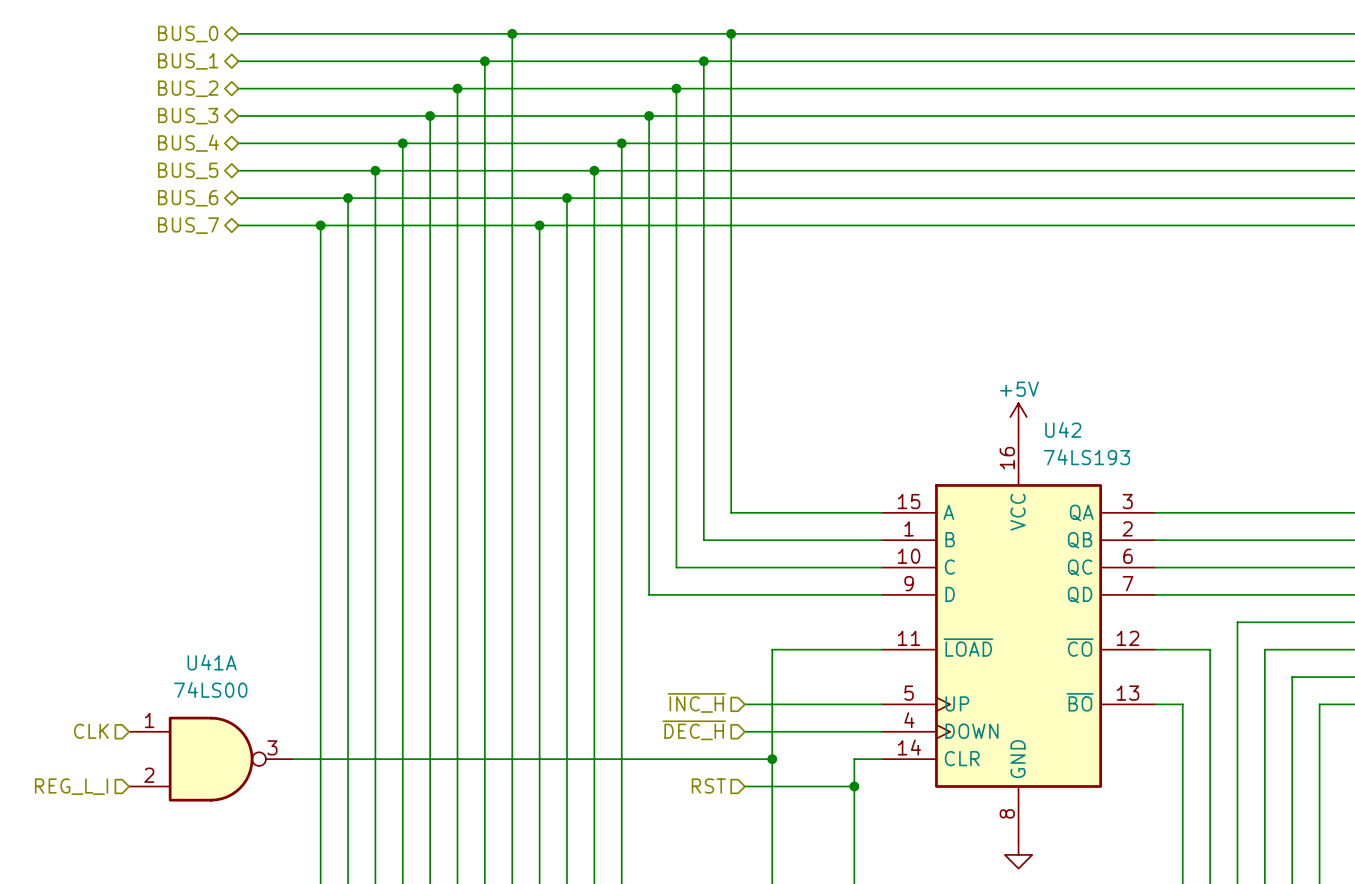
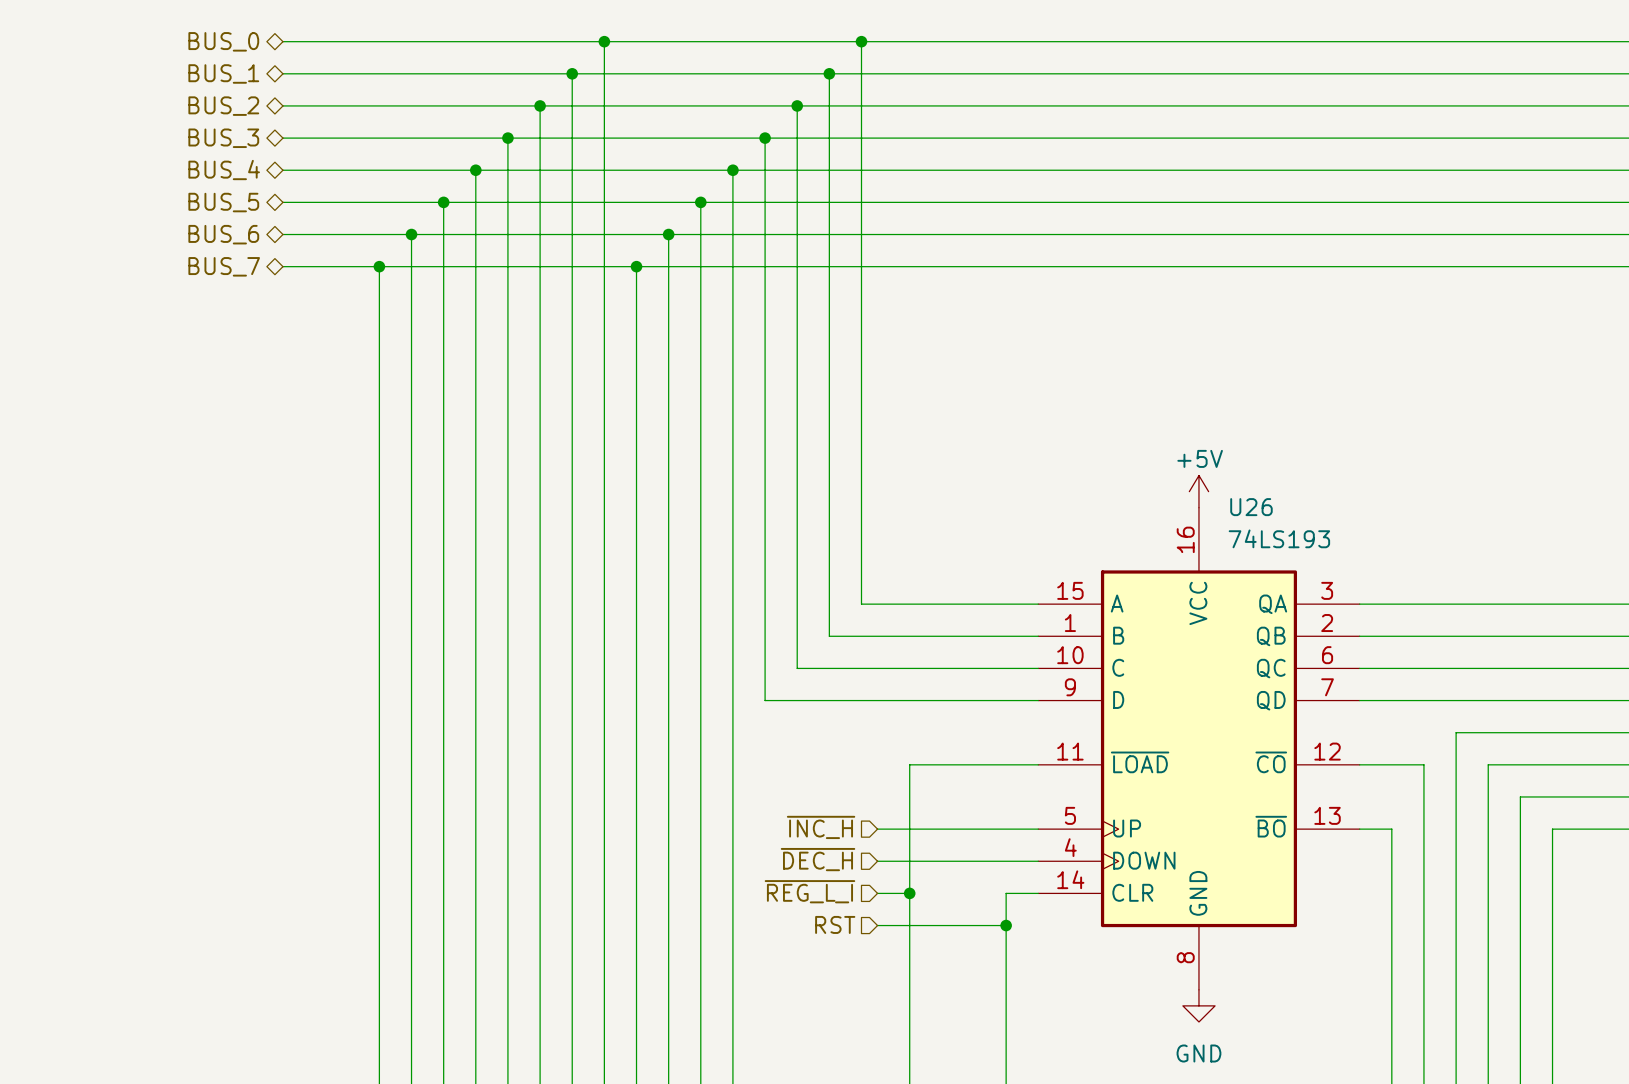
U42 name: U42 (1063, 429) -> U26 (1251, 507)
hierarchical label: CLK (91, 731) -> none
hierarchical label: none -> ~{REG_L_I} (809, 891)
U41A: 74LS00 (211, 759) -> none
wire: (293, 759) (744, 759) -> none
hierarchical label: REG_L_I (71, 786) -> none

